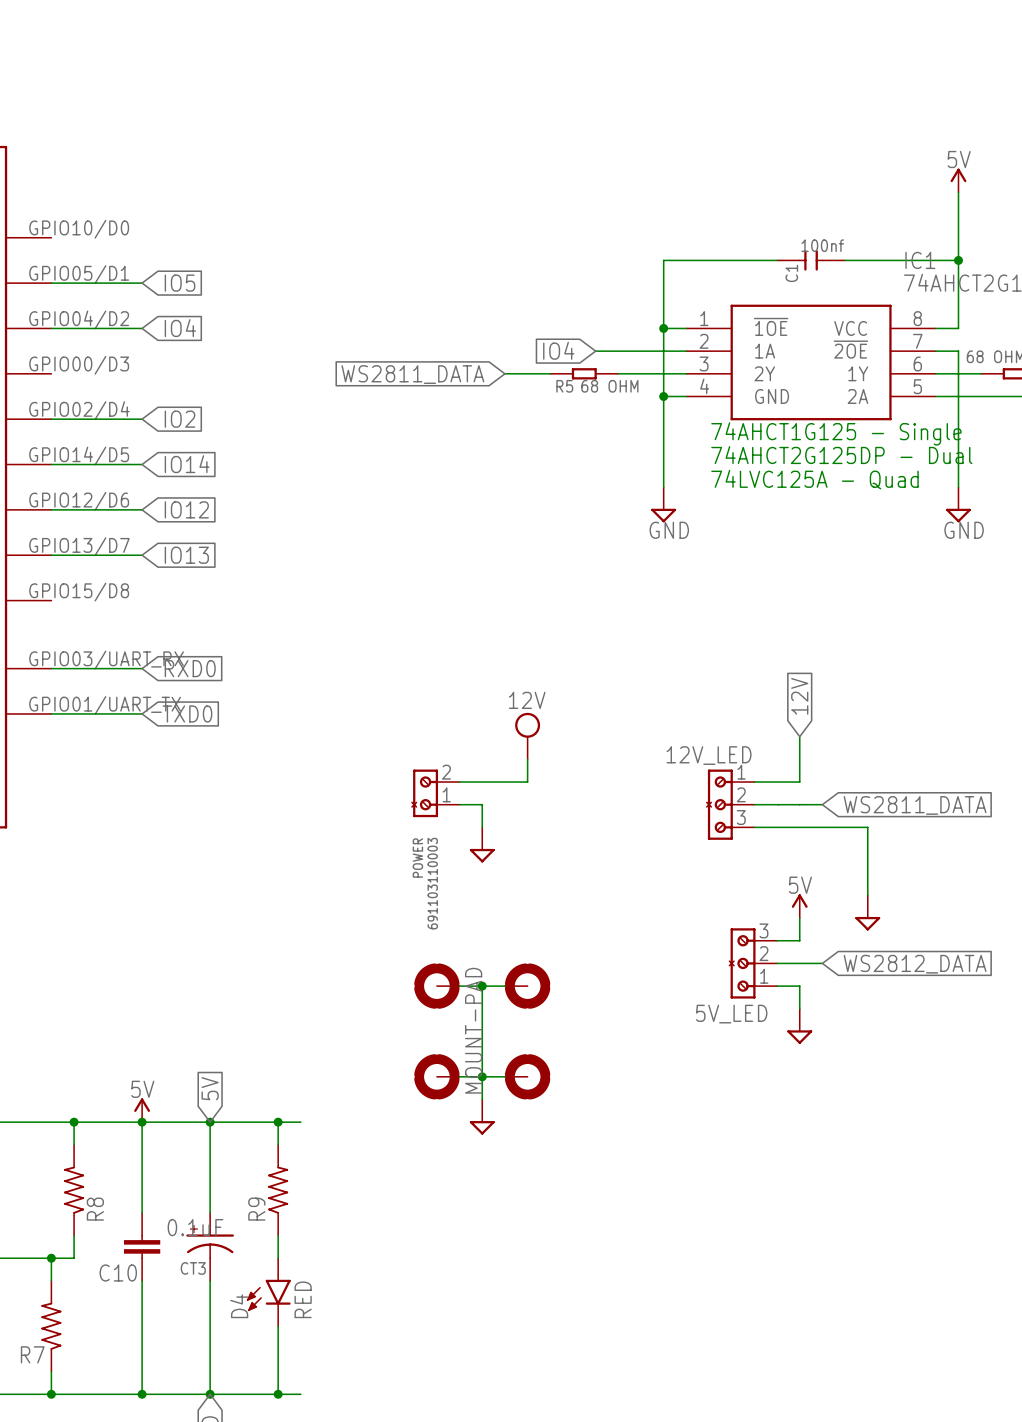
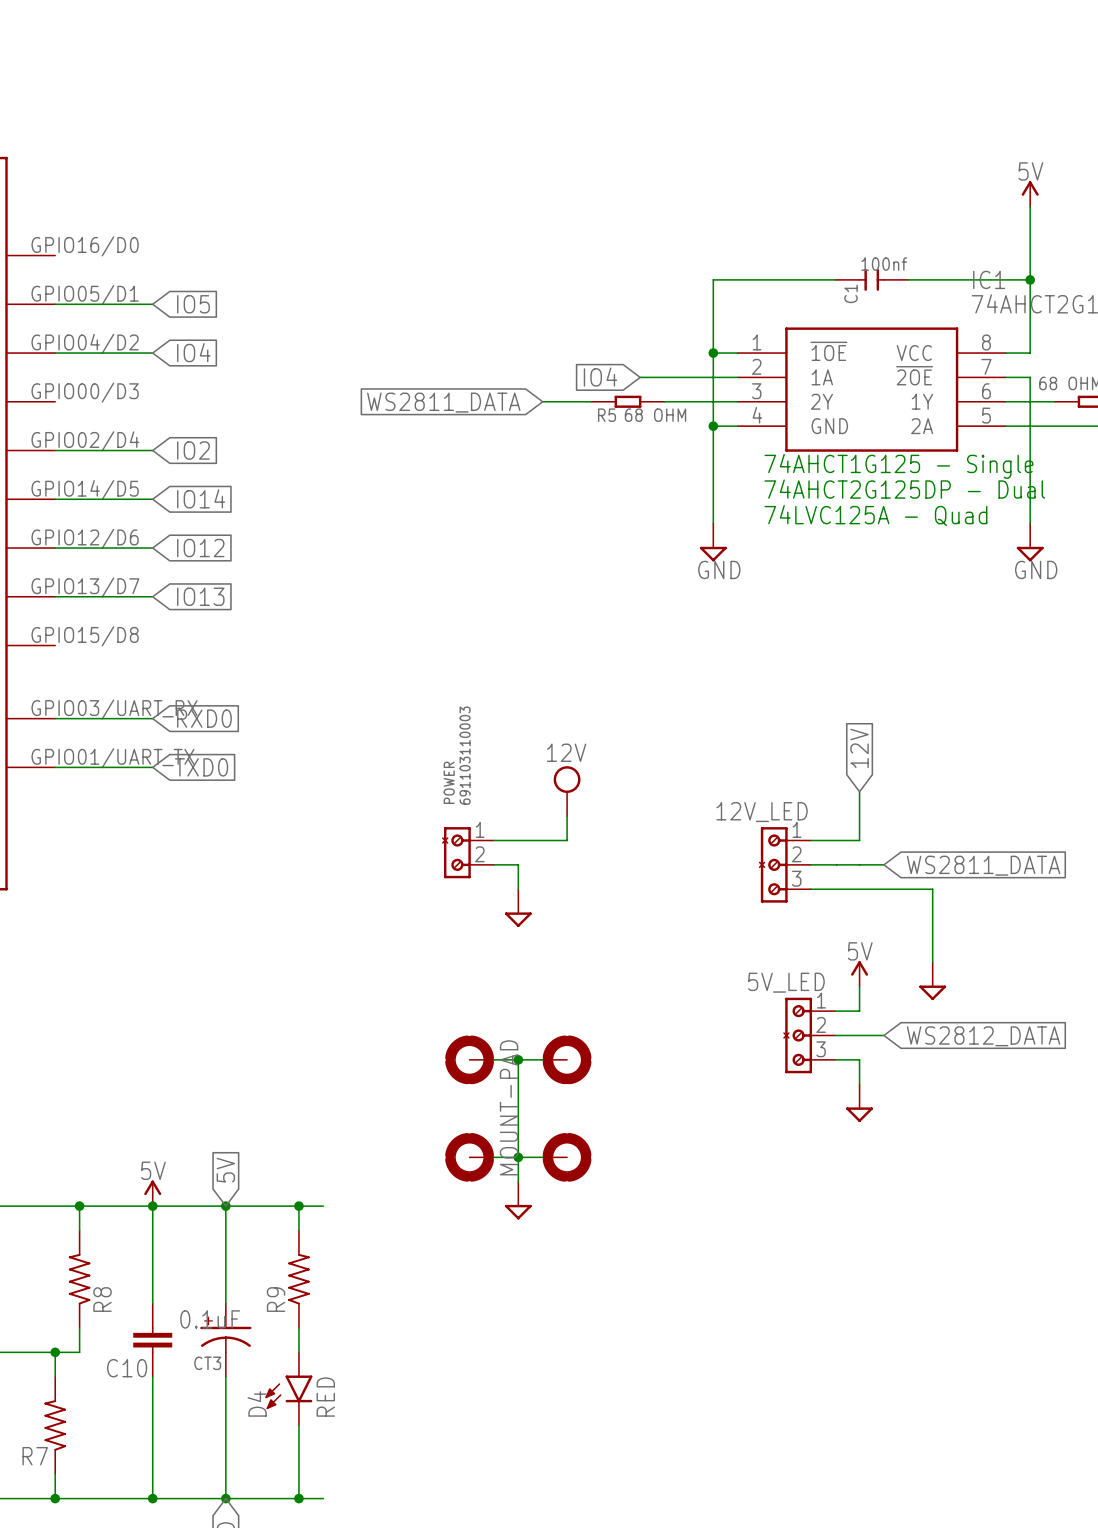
part pin number: GPIO10/D0 (79, 229) -> GPIO16/D0 (85, 246)
POWER flip: as is (424, 793) -> up-down (456, 852)
5V_LED flip: as is (742, 963) -> up-down (797, 1035)

